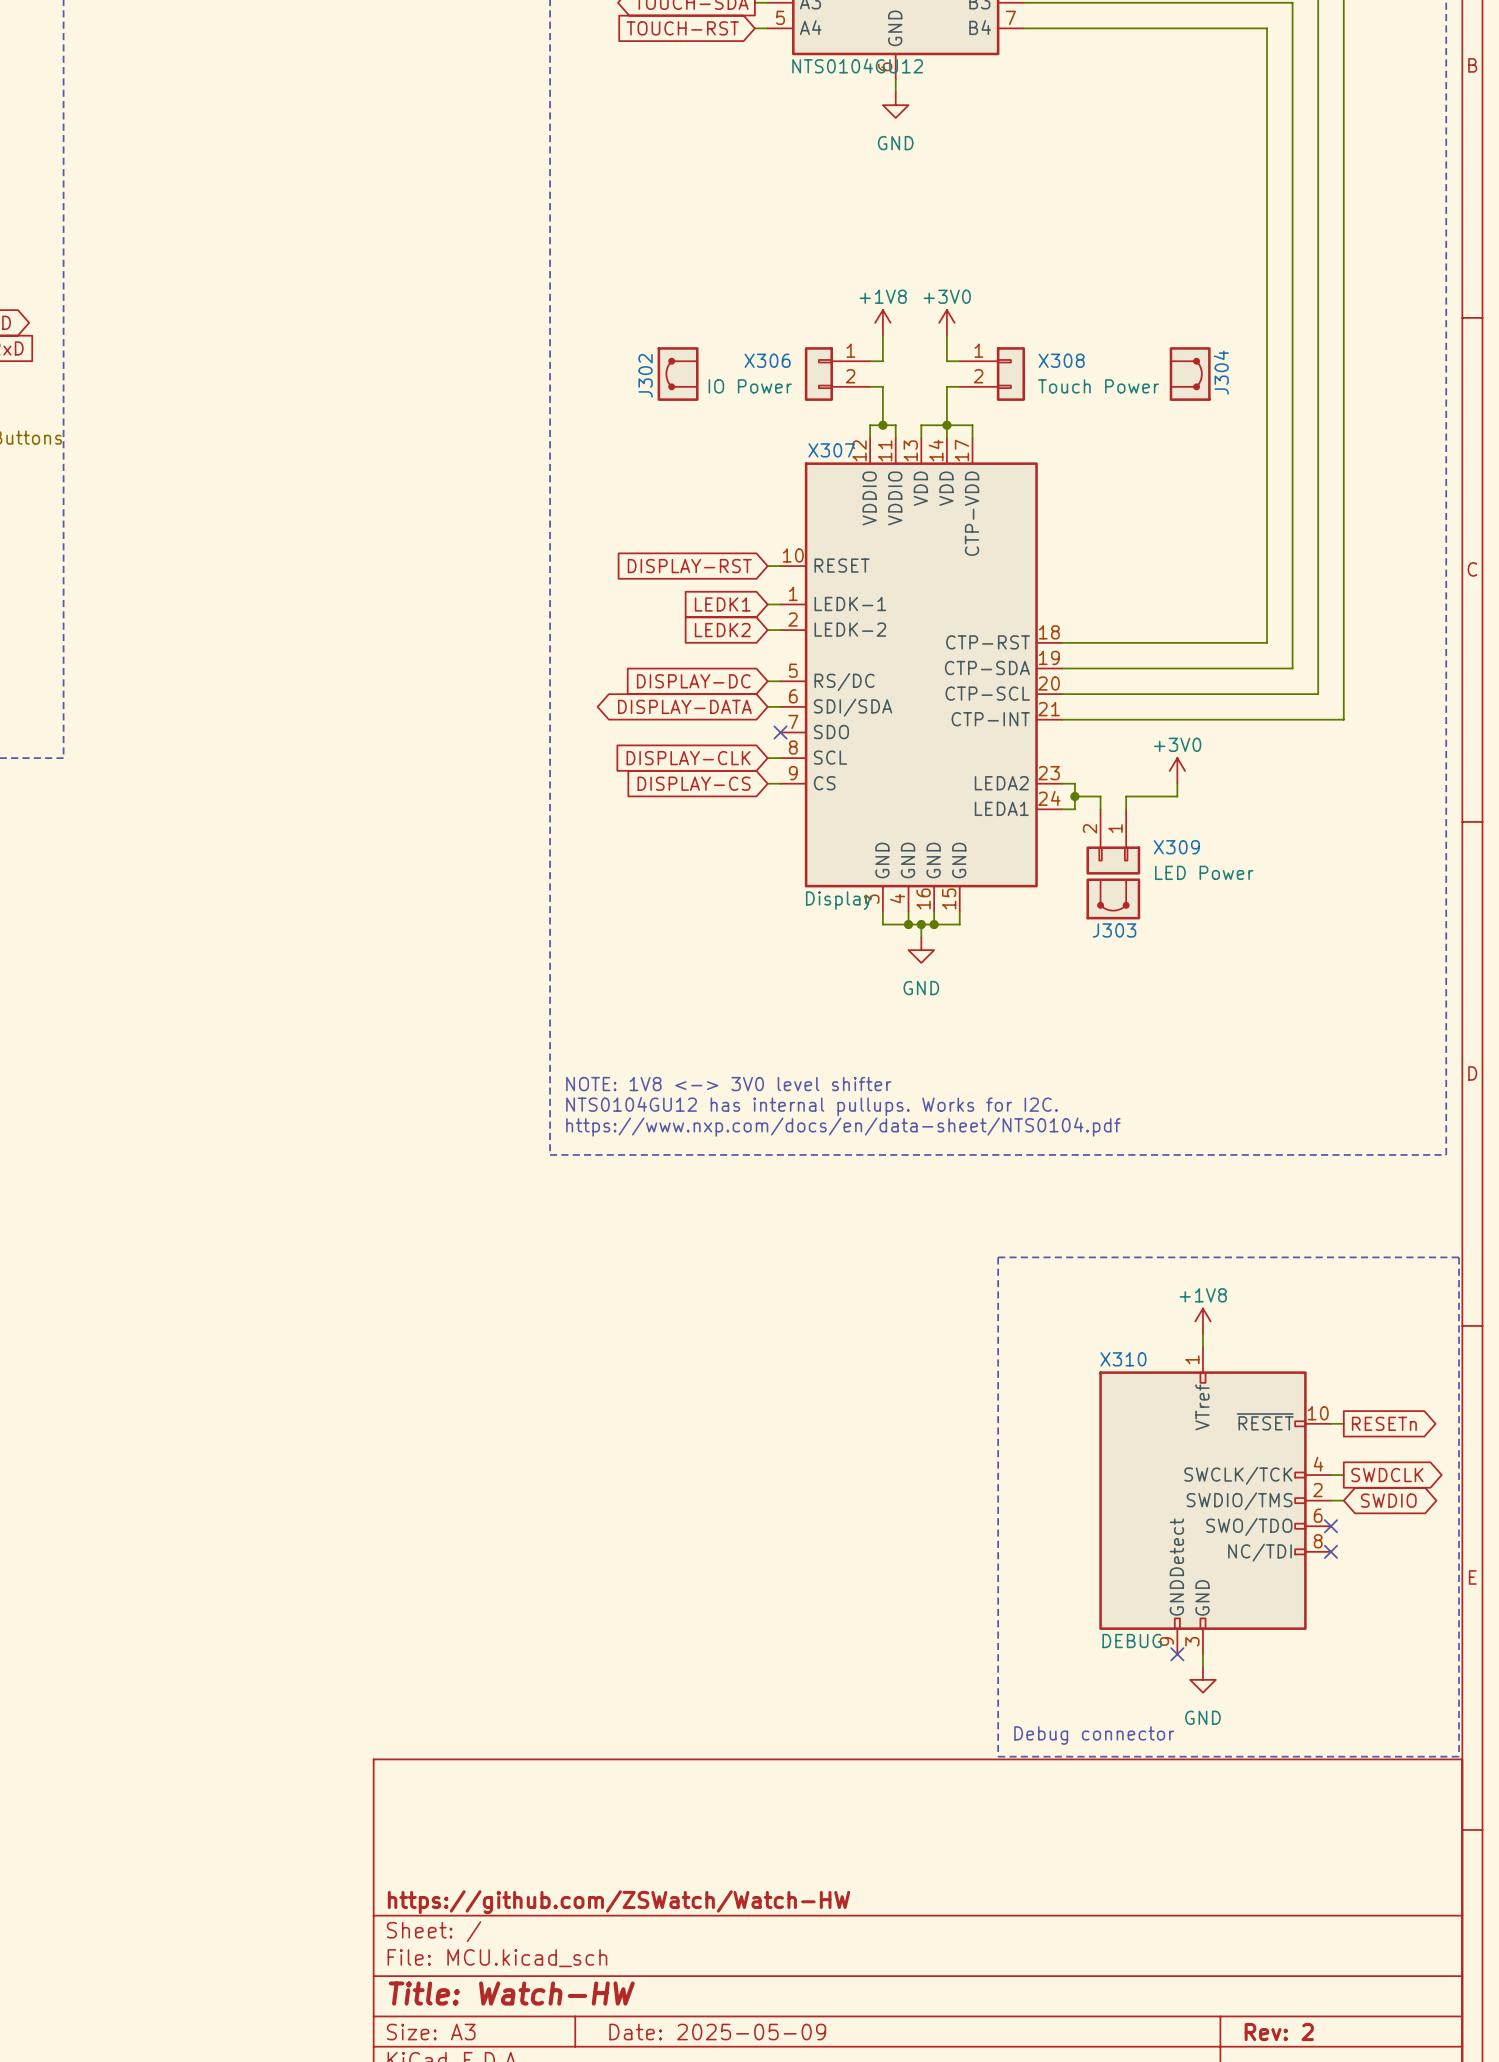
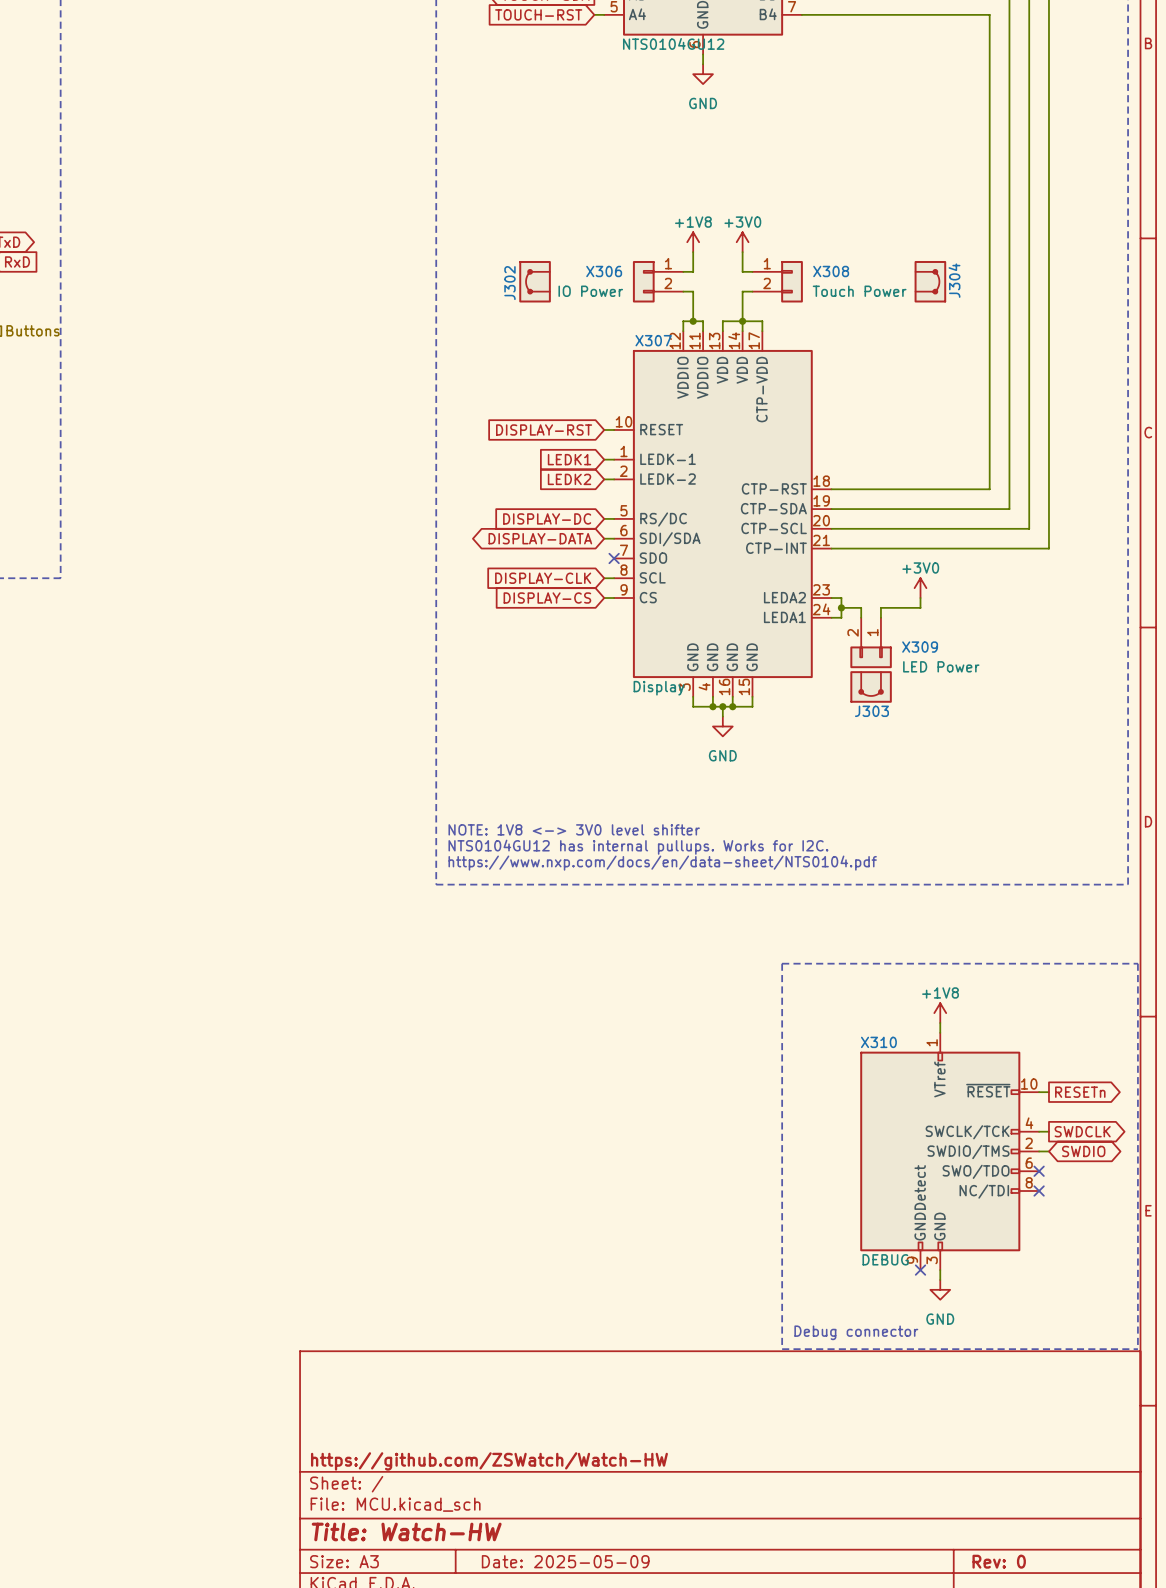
title block: Rev: 2 (1279, 2032) -> Rev: 0 (999, 1561)

